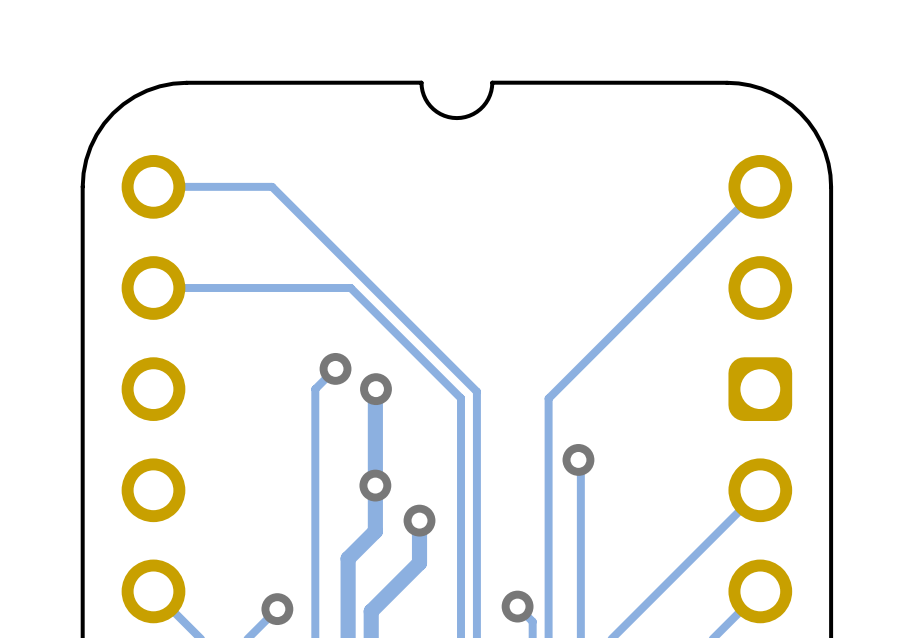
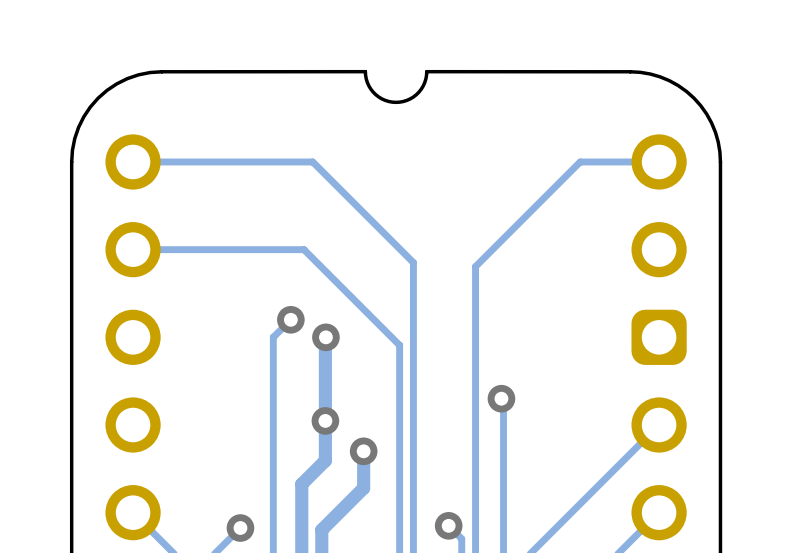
track: (272, 186) (476, 391) -> (235, 161) (312, 161) (413, 262) (413, 339)
track: (760, 186) (548, 398) -> (659, 161) (580, 161) (475, 266) (475, 345)

